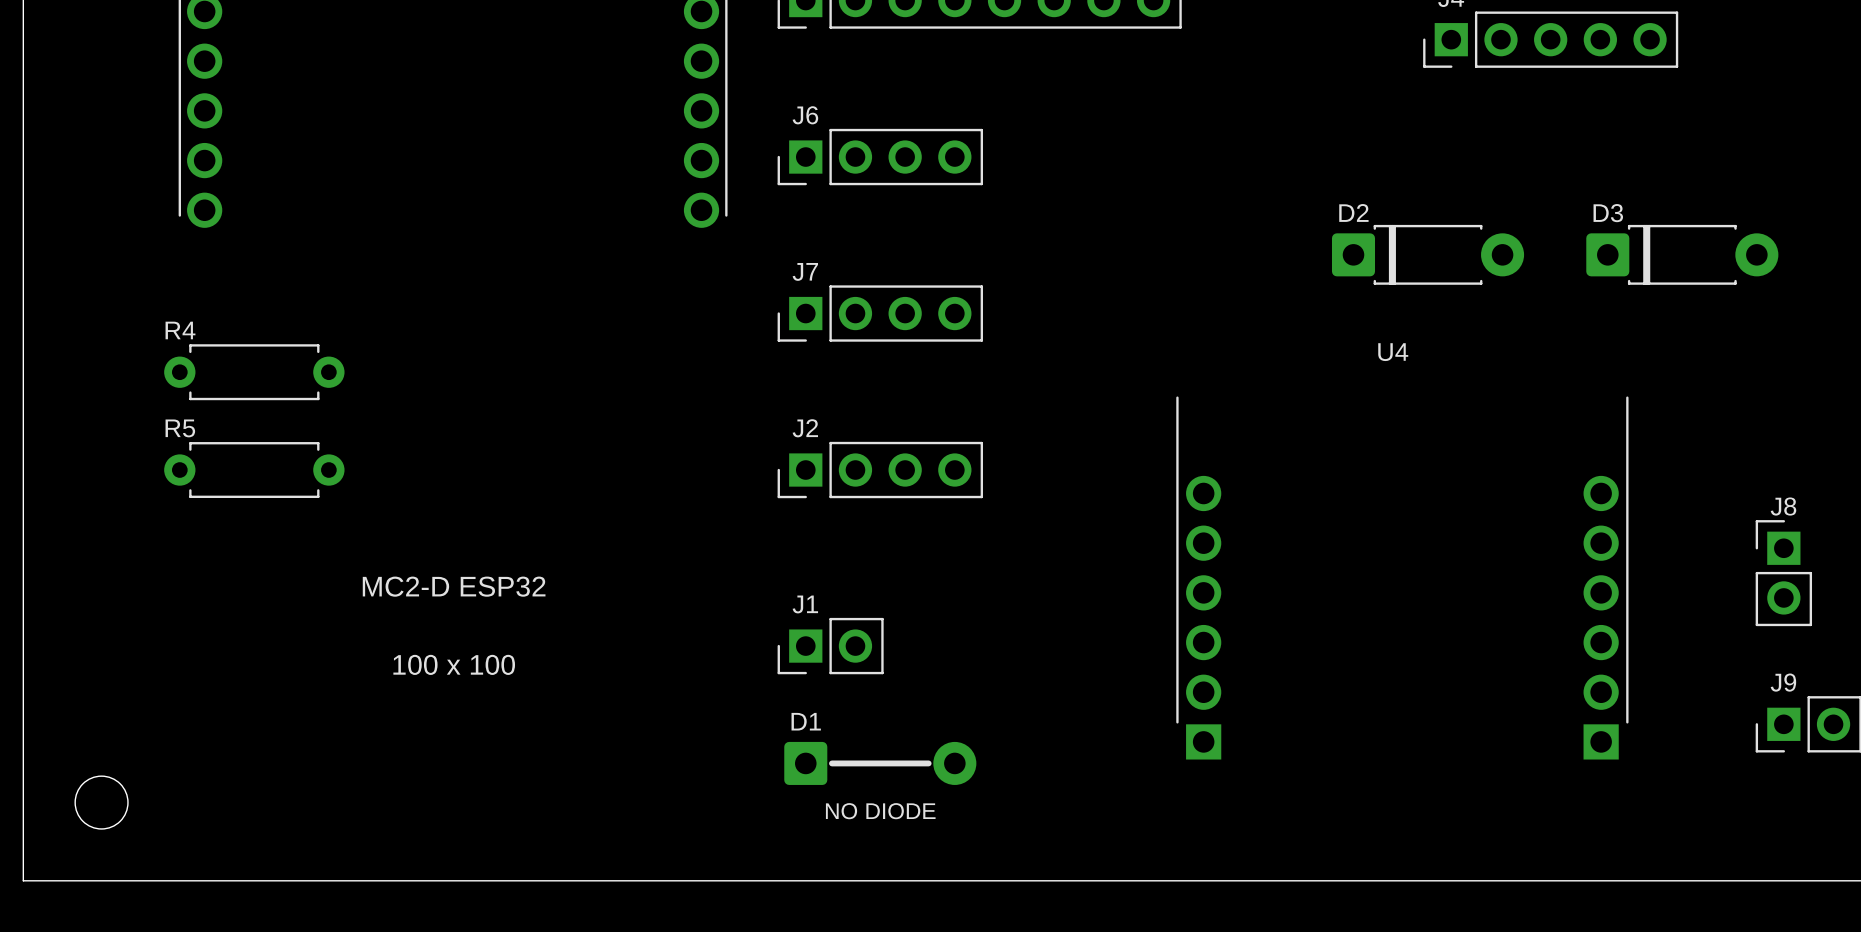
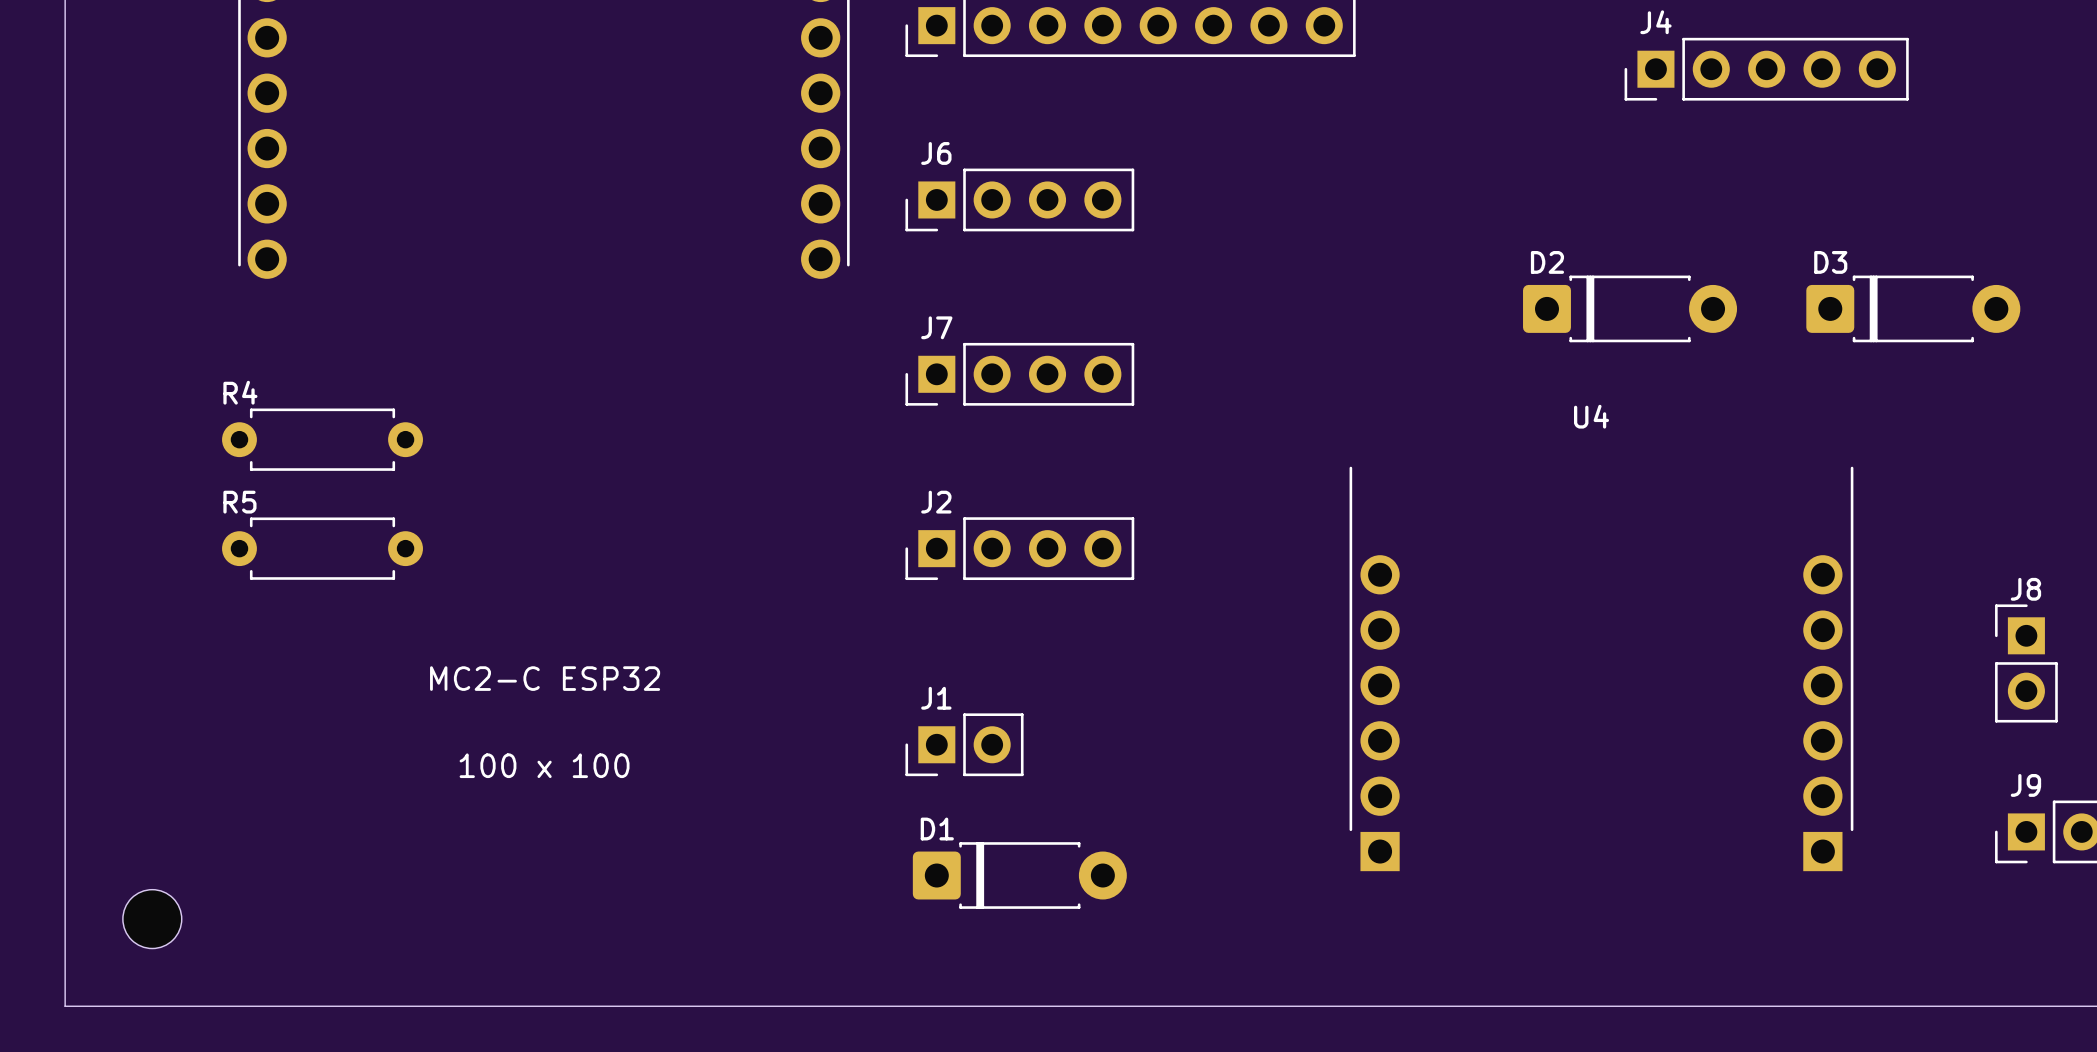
text: MC2-D ESP32 (454, 586) -> MC2-C ESP32 (545, 678)
D1 footprint: [784, 741, 977, 785] -> [912, 842, 1127, 909]

